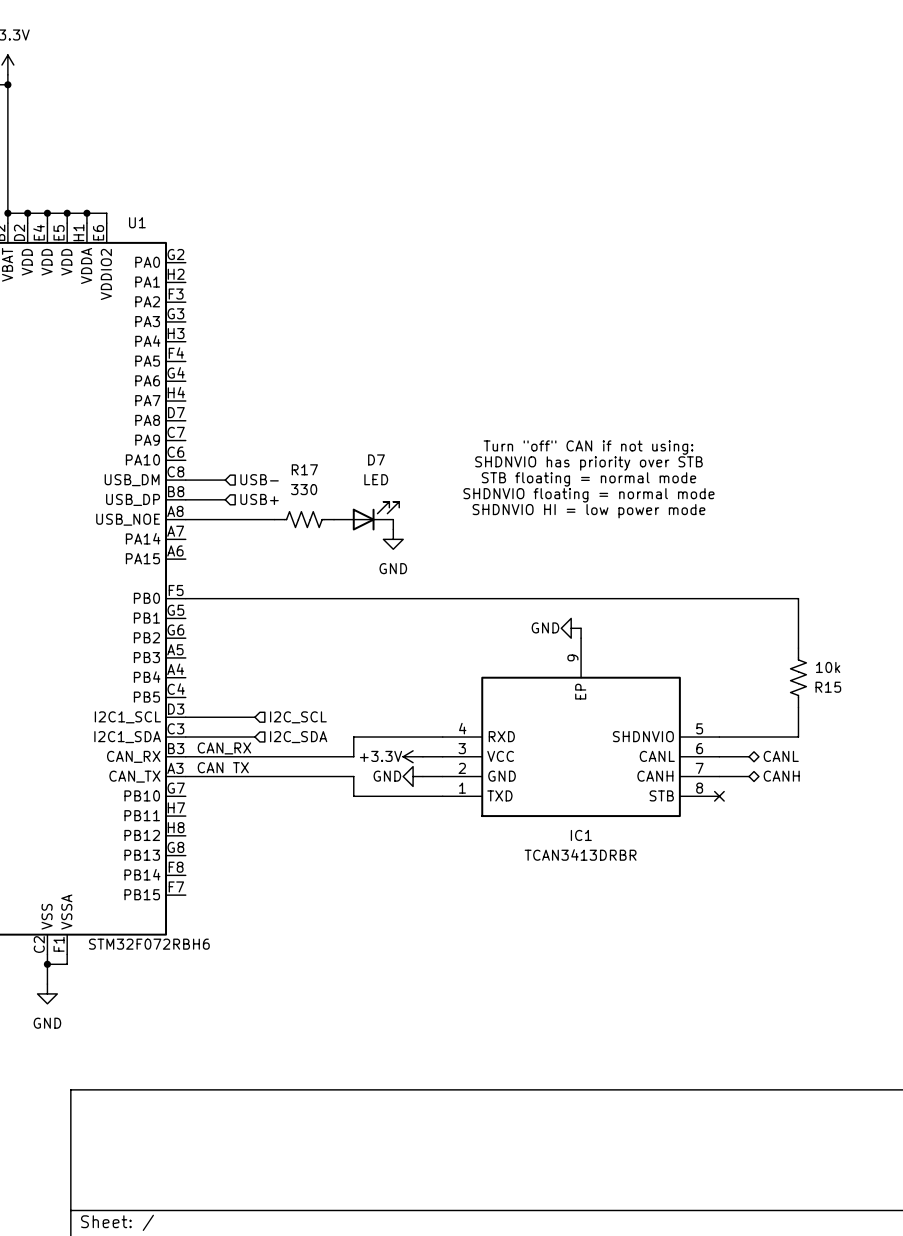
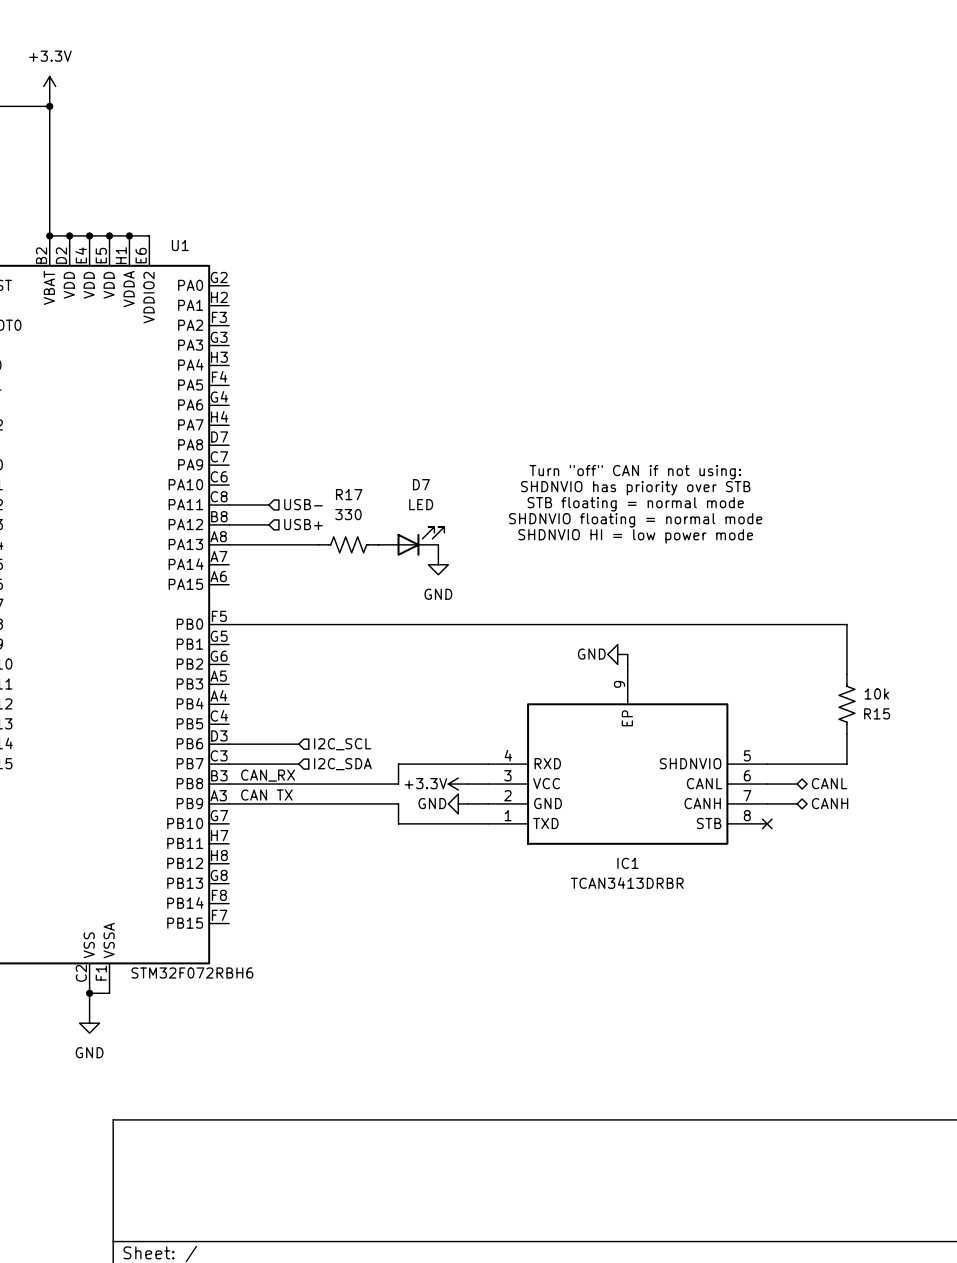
U1 pin name: USB_DM (132, 480) -> PA11 (185, 504)
U1 pin name: USB_DP (133, 499) -> PA12 (185, 524)
U1 pin name: USB_NOE (128, 519) -> PA13 (185, 544)
U1 pin name: I2C1_SCL (127, 717) -> PB6 (189, 743)
U1 pin name: I2C1_SDA (127, 737) -> PB7 (190, 763)
U1 pin name: CAN_RX (133, 756) -> PB8 (189, 783)
U1 pin name: CAN_TX (134, 776) -> PB9 (189, 803)

